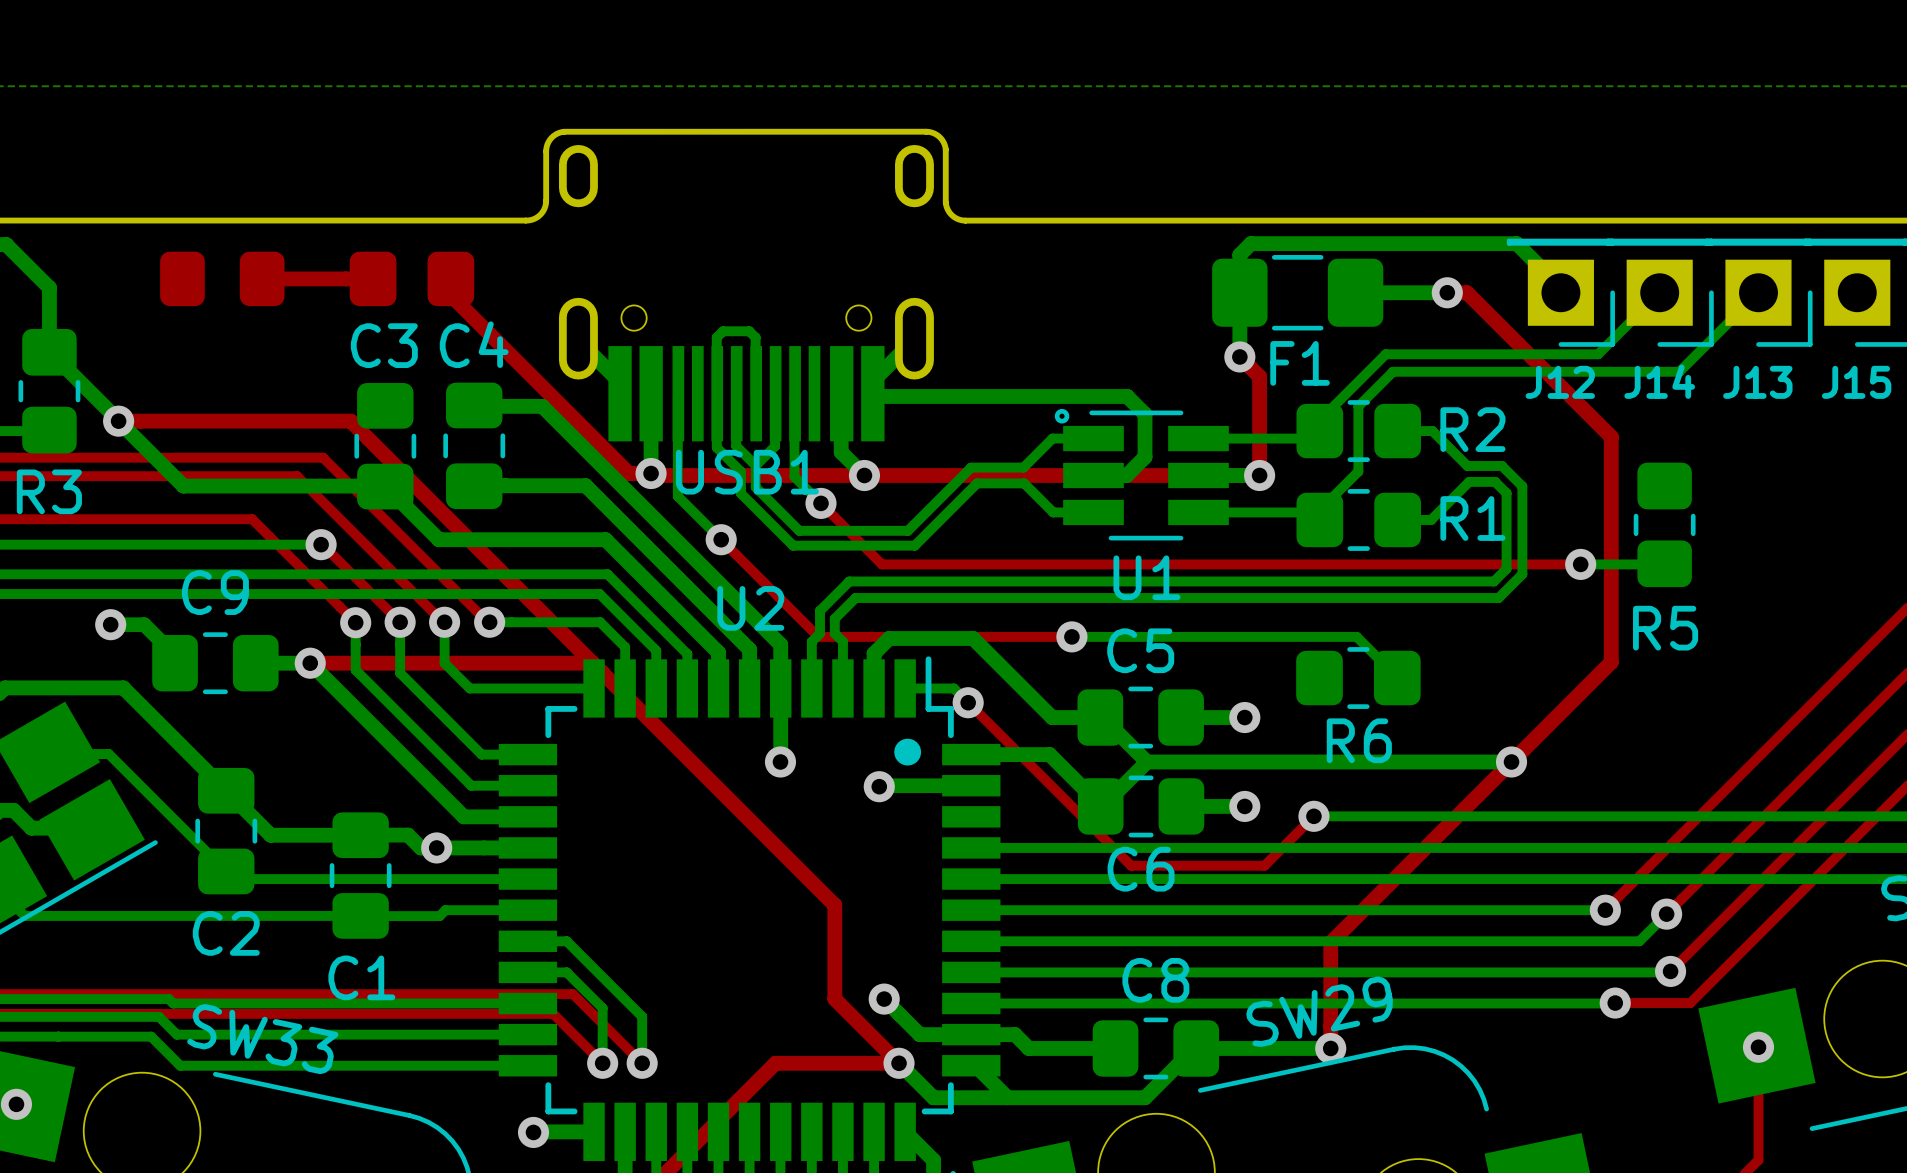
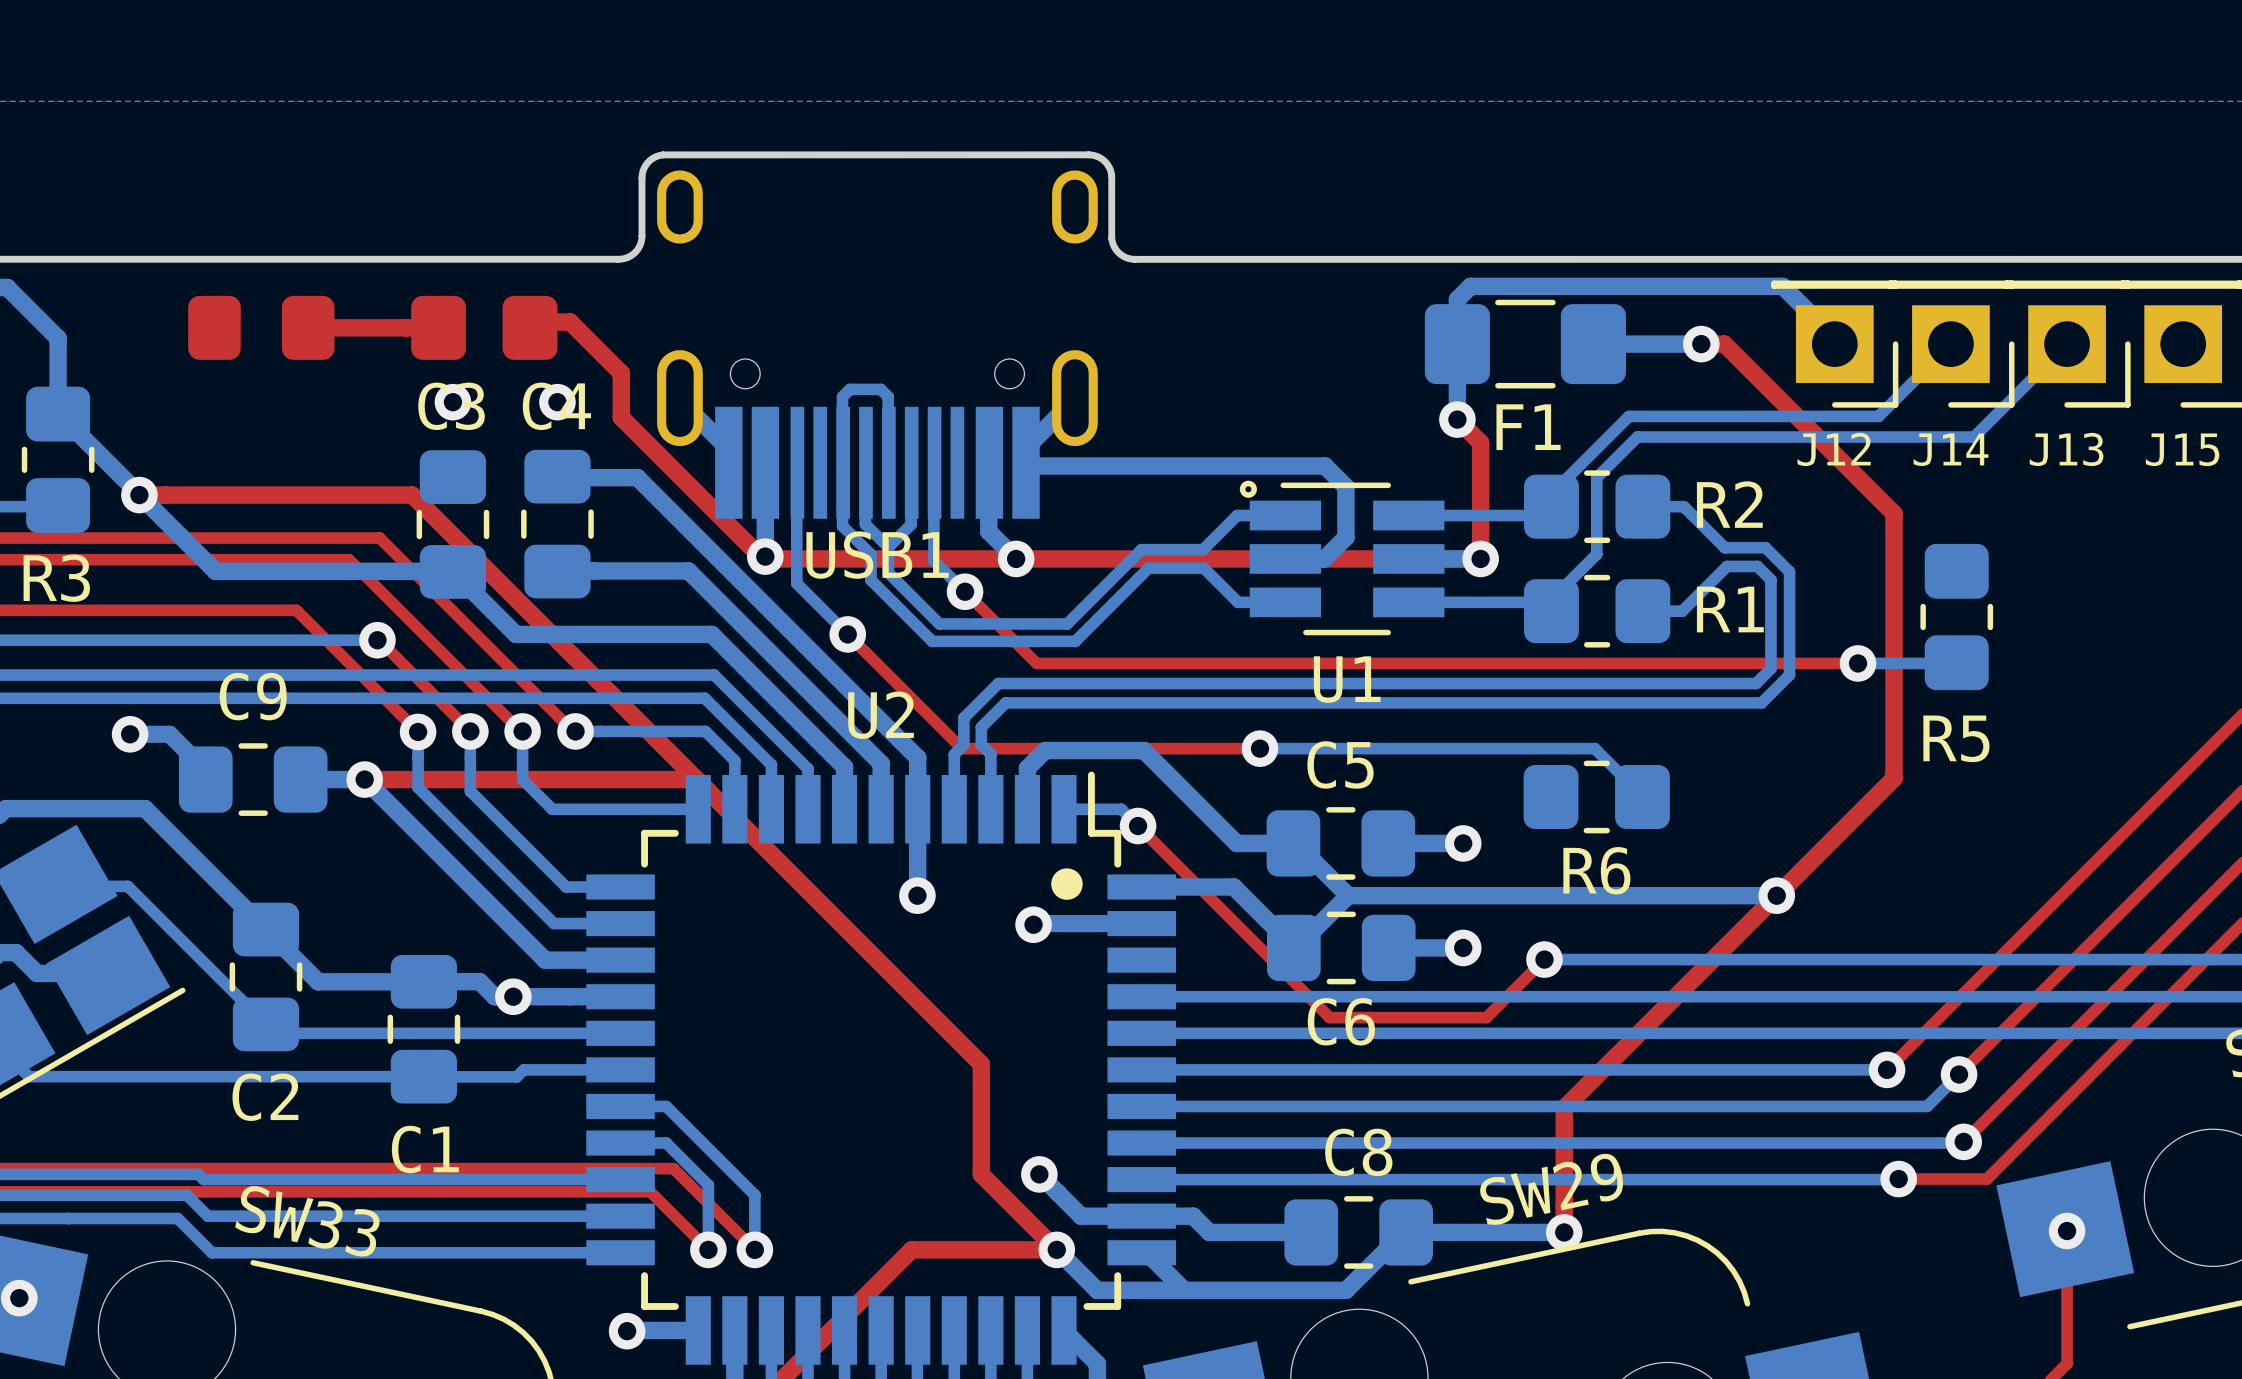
top track: (451, 273) (451, 296) (629, 473) (646, 473) -> (531, 322) (570, 322) (621, 373) (621, 417) (760, 556)
via: none -> (452, 402)
via: none -> (557, 402)

